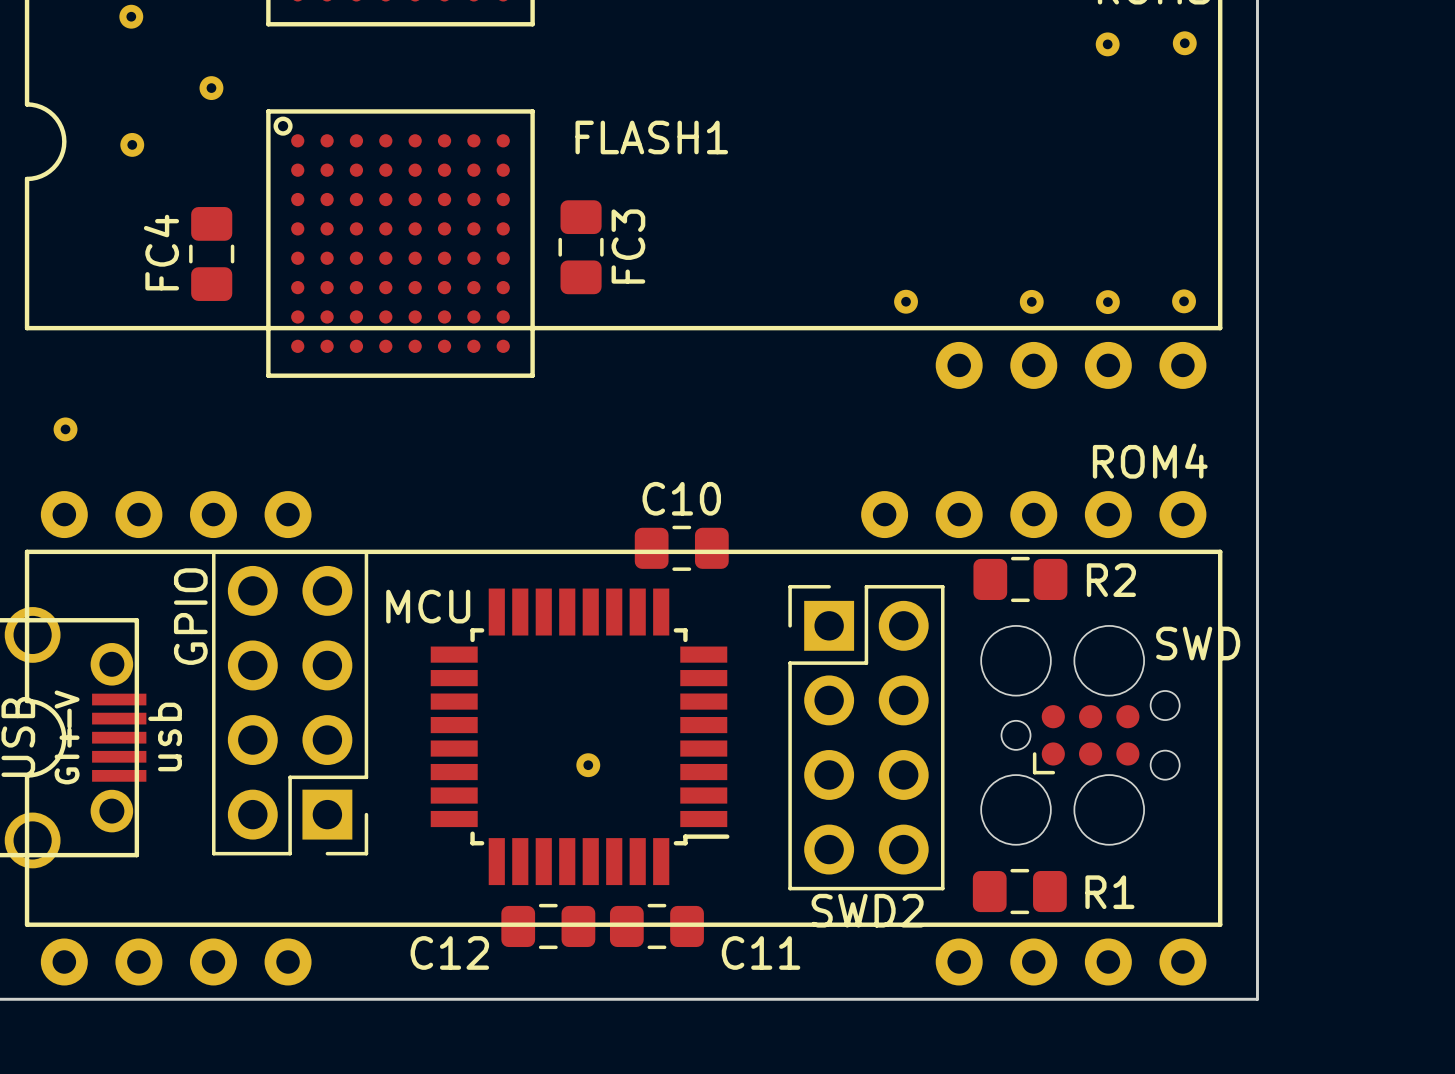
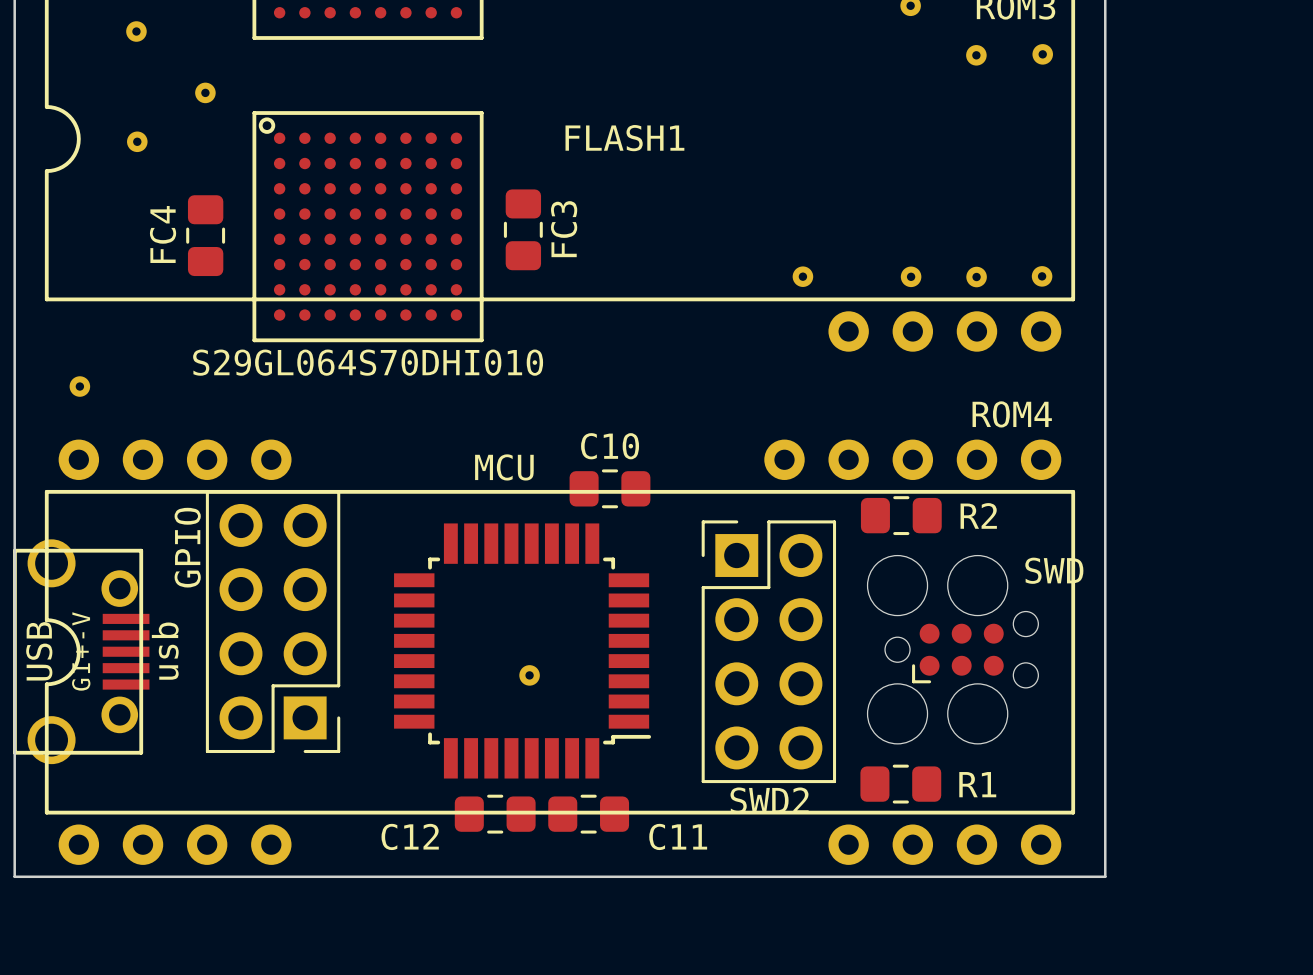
FLASH1 name position: FLASH1 (651, 137) -> FLASH1 (624, 138)
FLASH1 value: none -> S29GL064S70DHI010 (368, 362)
MCU name position: MCU (428, 606) -> MCU (504, 467)

